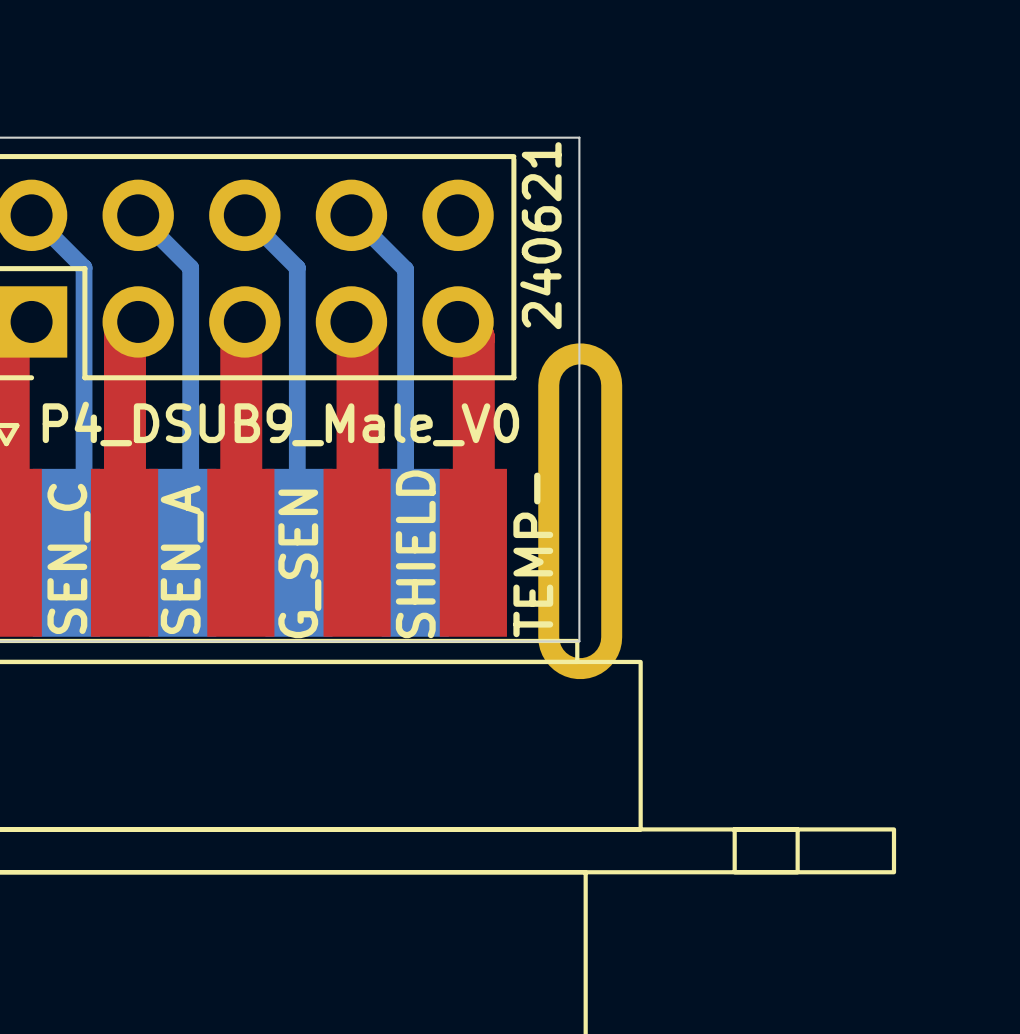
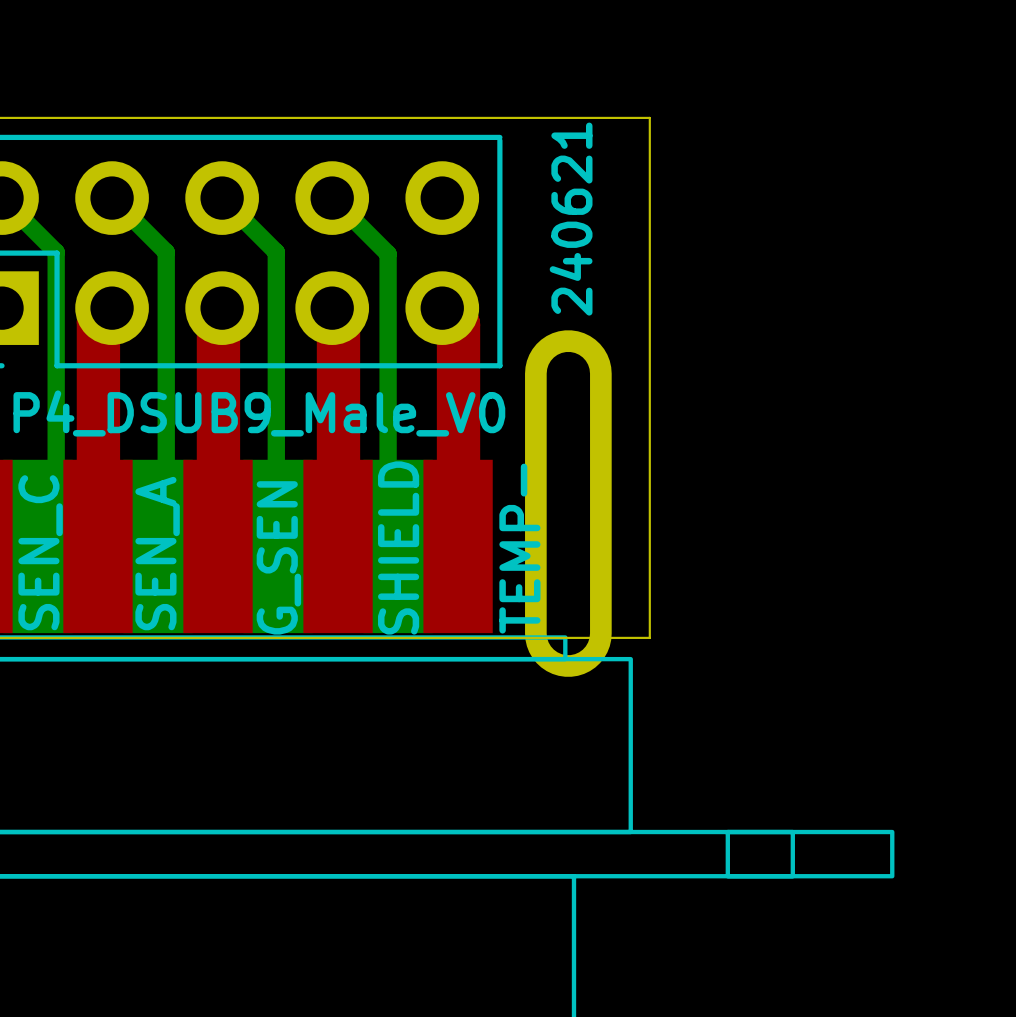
board edge: (579, 137) (579, 641) -> (567, 117) (649, 117) (649, 637) (567, 637)
text position: 240621 (540, 235) -> 240621 (571, 219)

